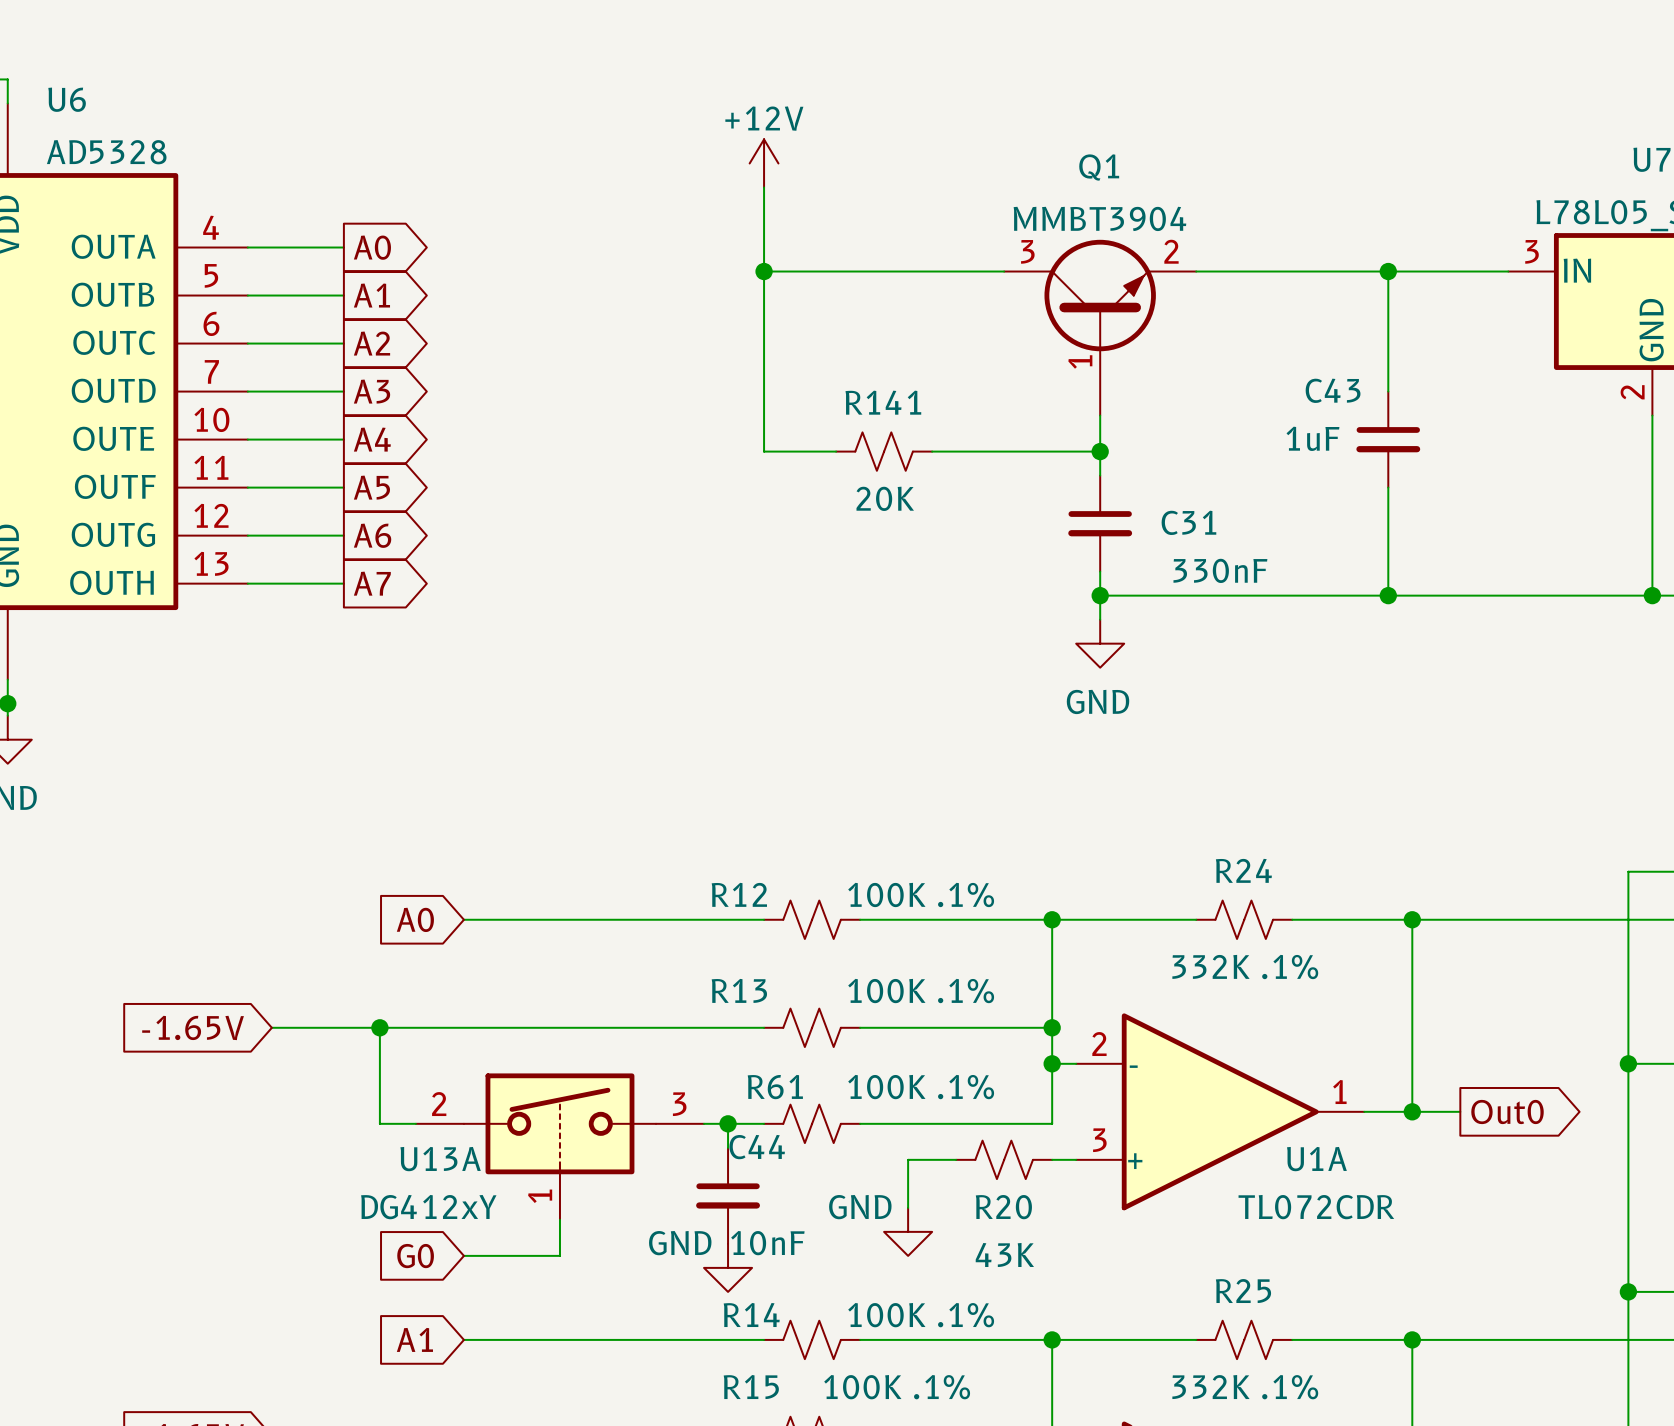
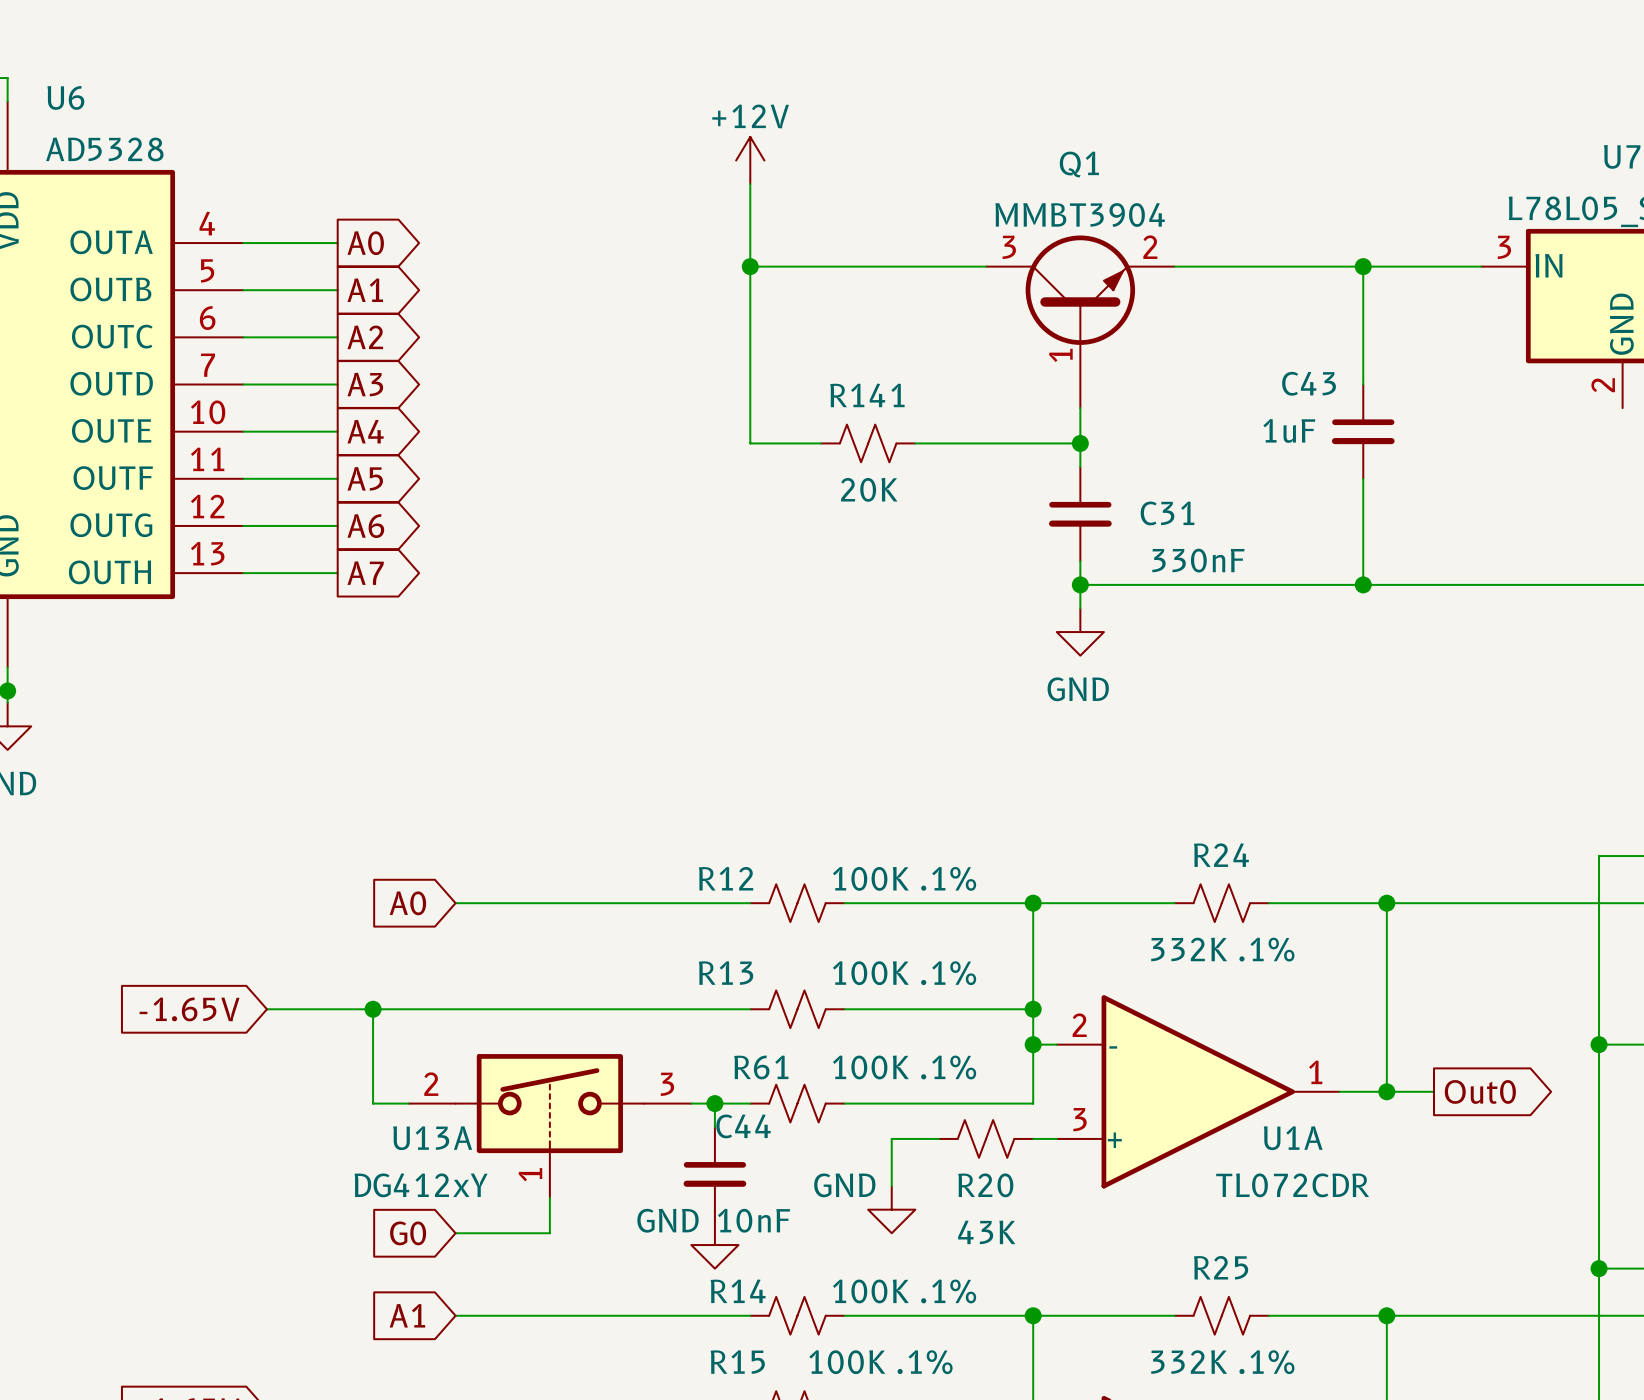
wire: (1652, 415) (1652, 595) -> none
junction: (1652, 595) -> none

